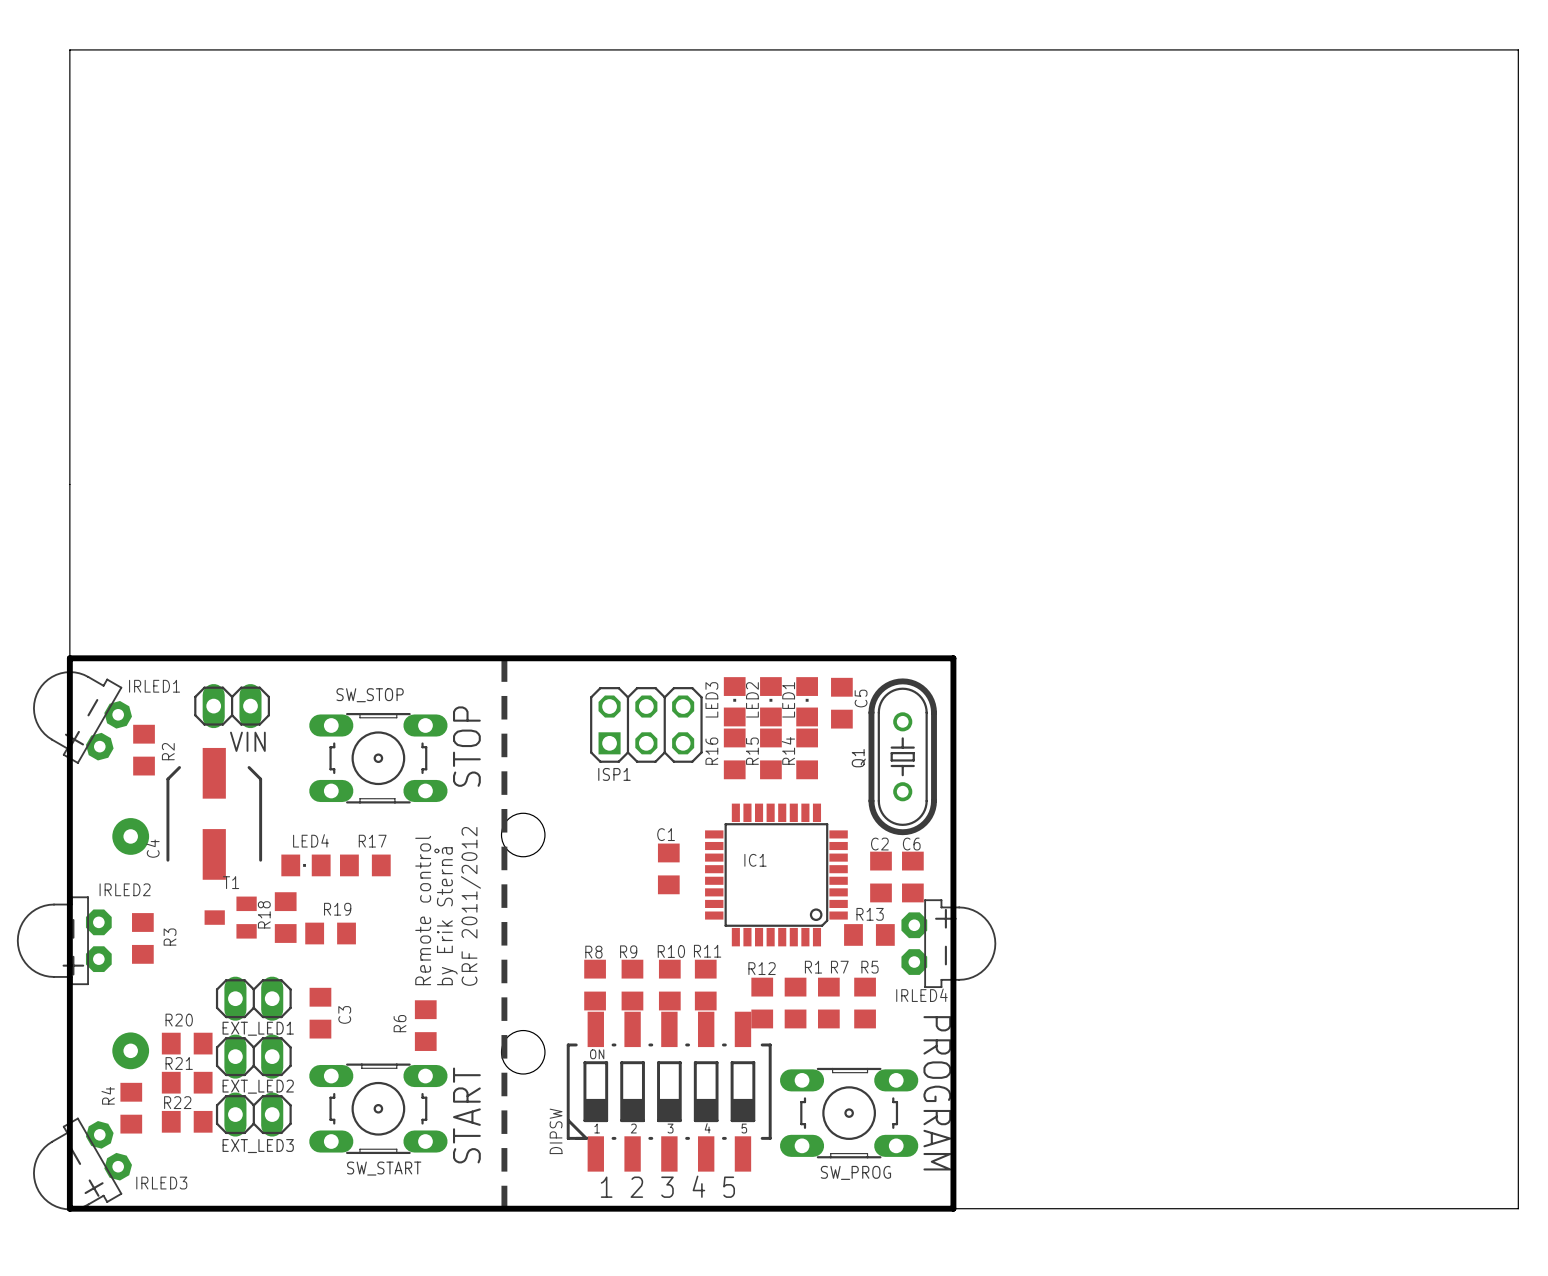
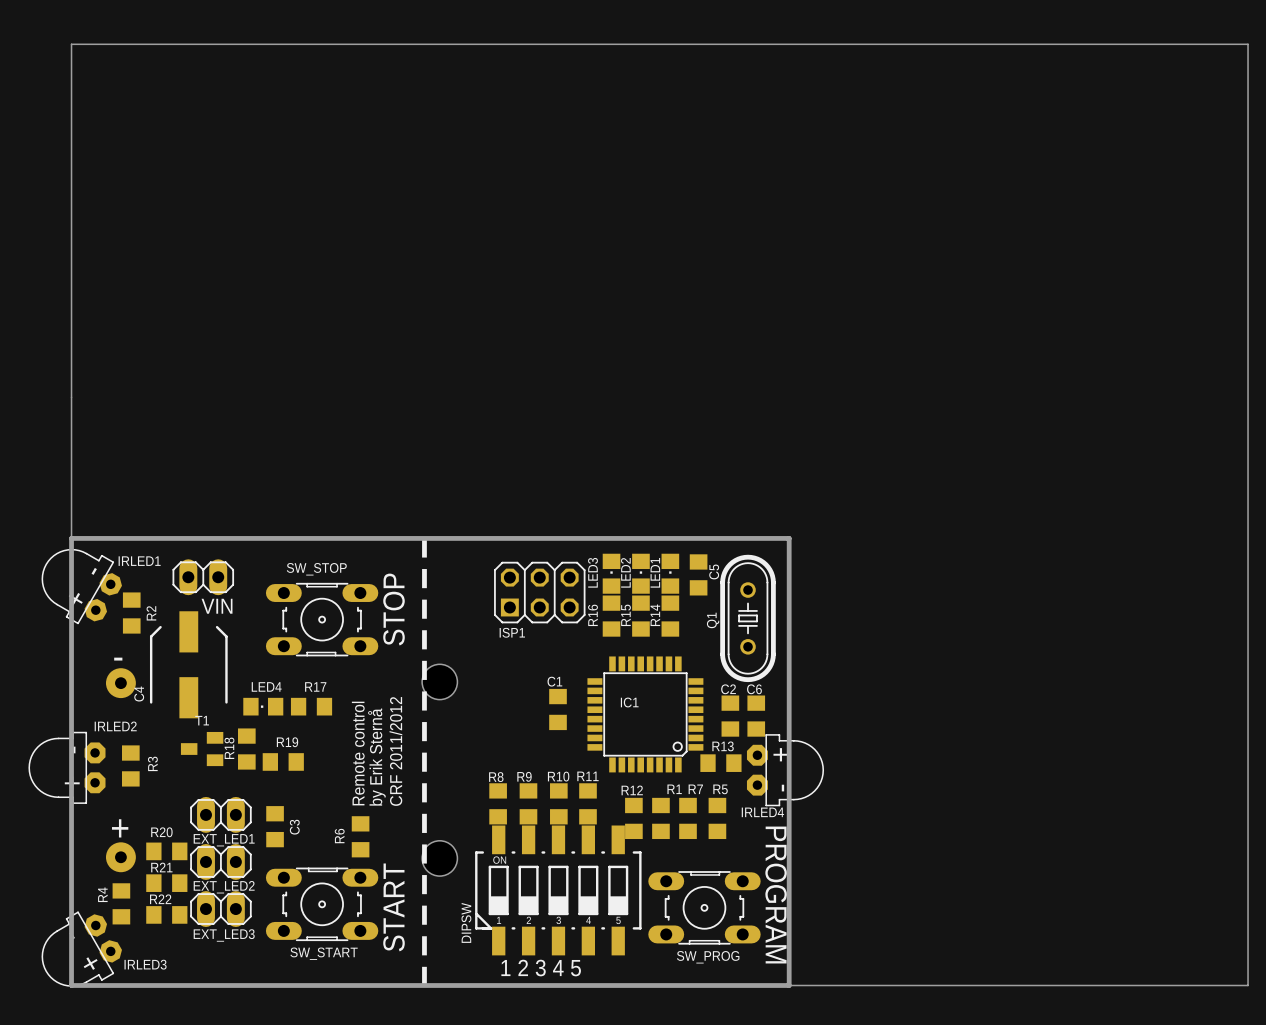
text: none -> - (118, 659)
text: none -> + (120, 828)

